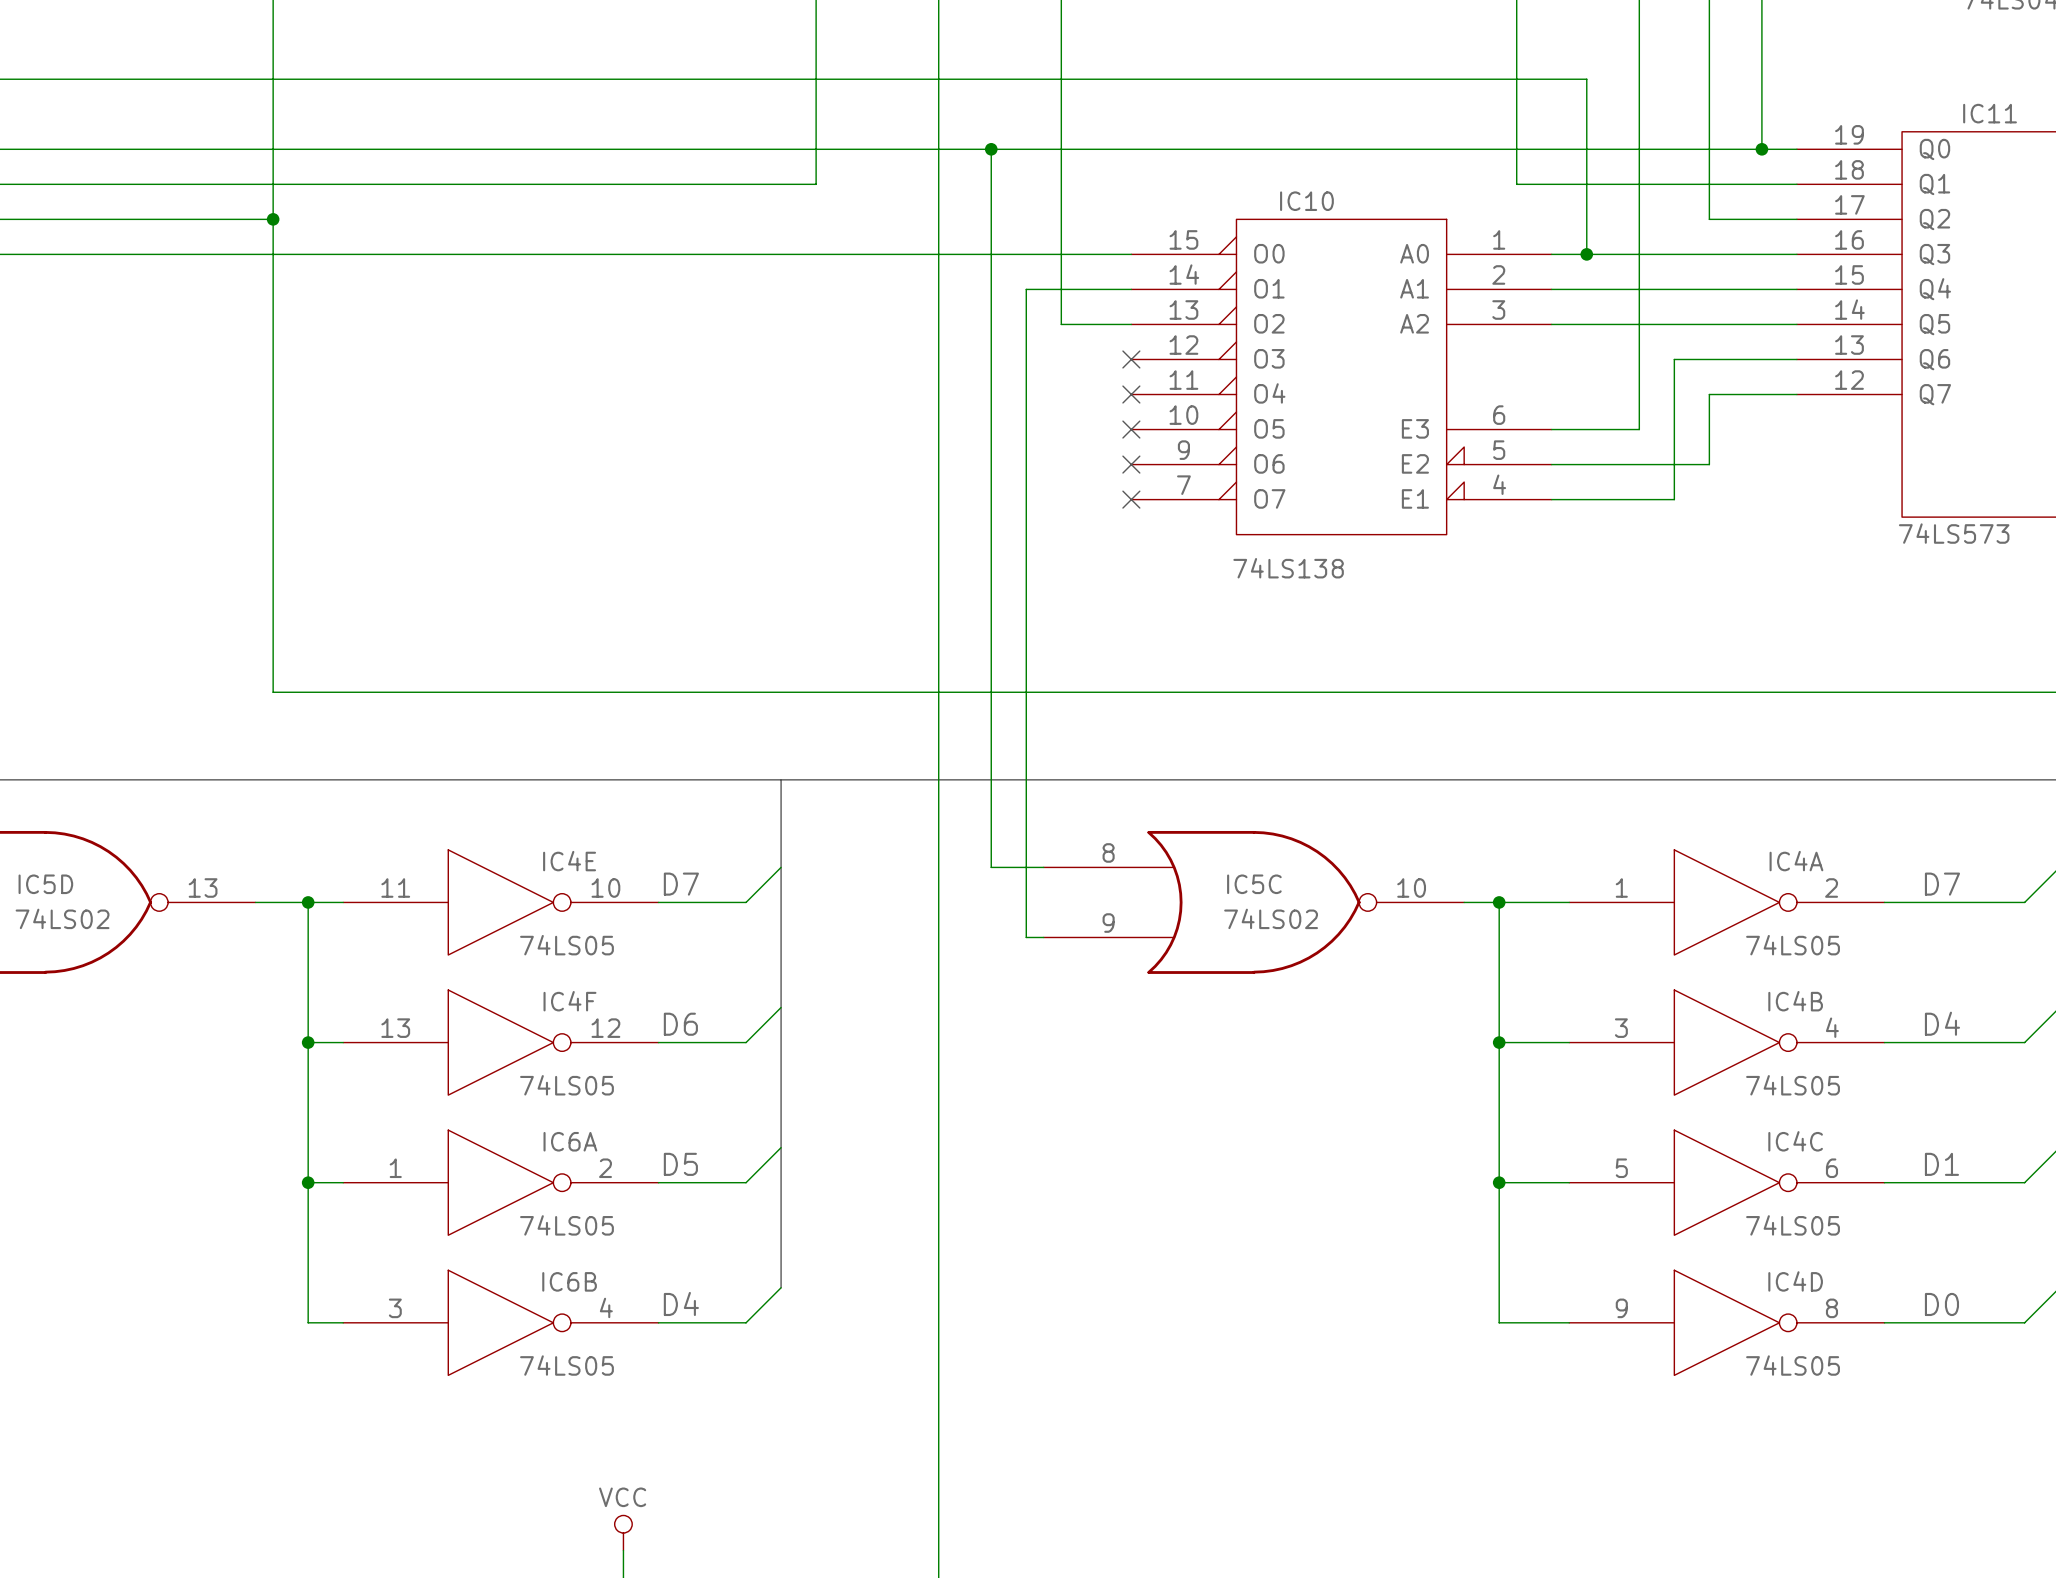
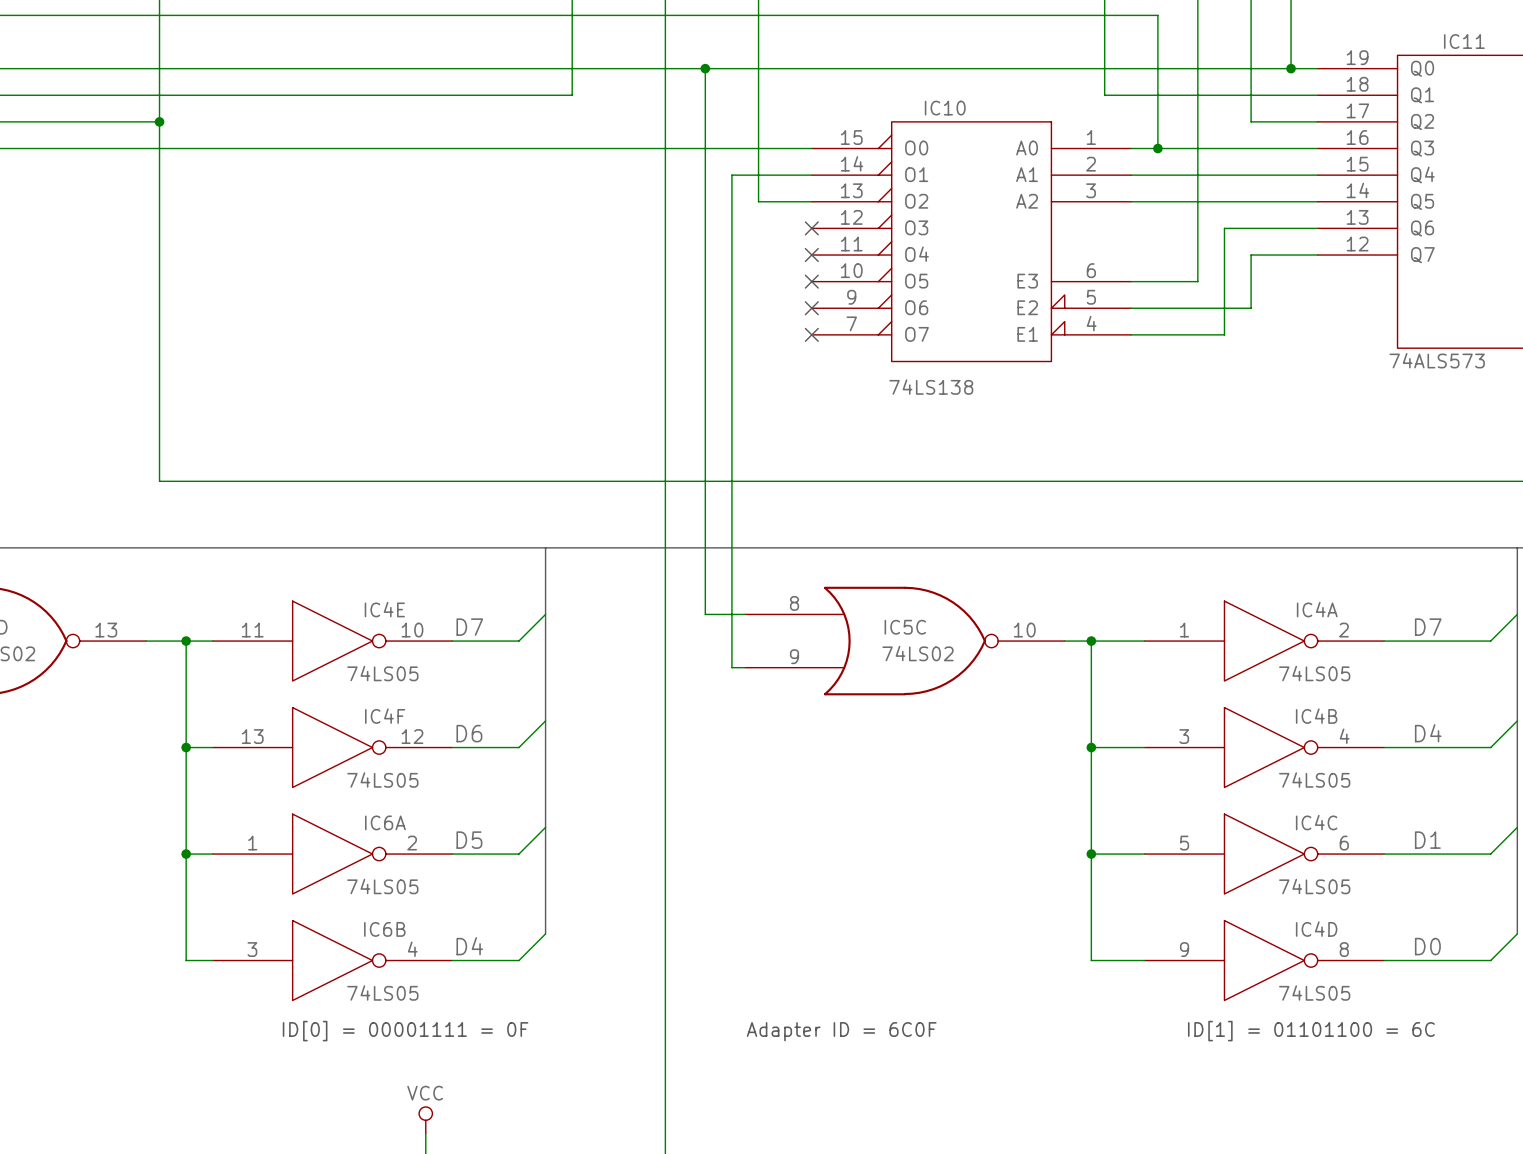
IC11 value: 74LS573 (1954, 533) -> 74ALS573 (1437, 360)
text: none -> ID[0] = 00001111 = 0F (405, 1031)
text: none -> ID[1] = 01101100 = 6C (1311, 1031)
text: none -> Adapter ID = 6C0F (841, 1031)

